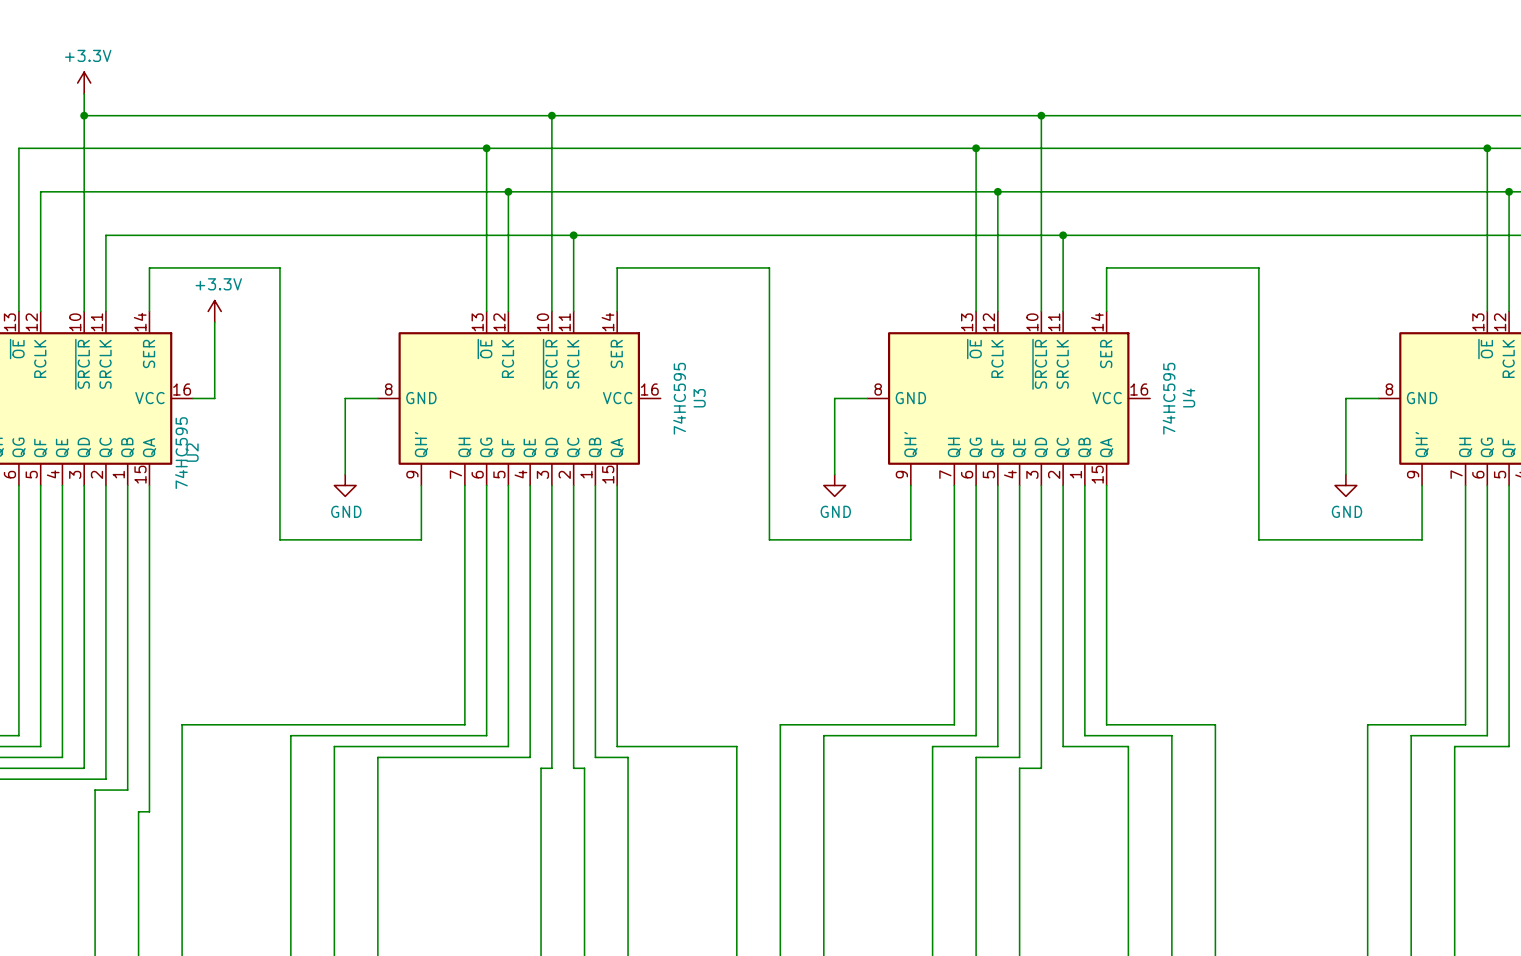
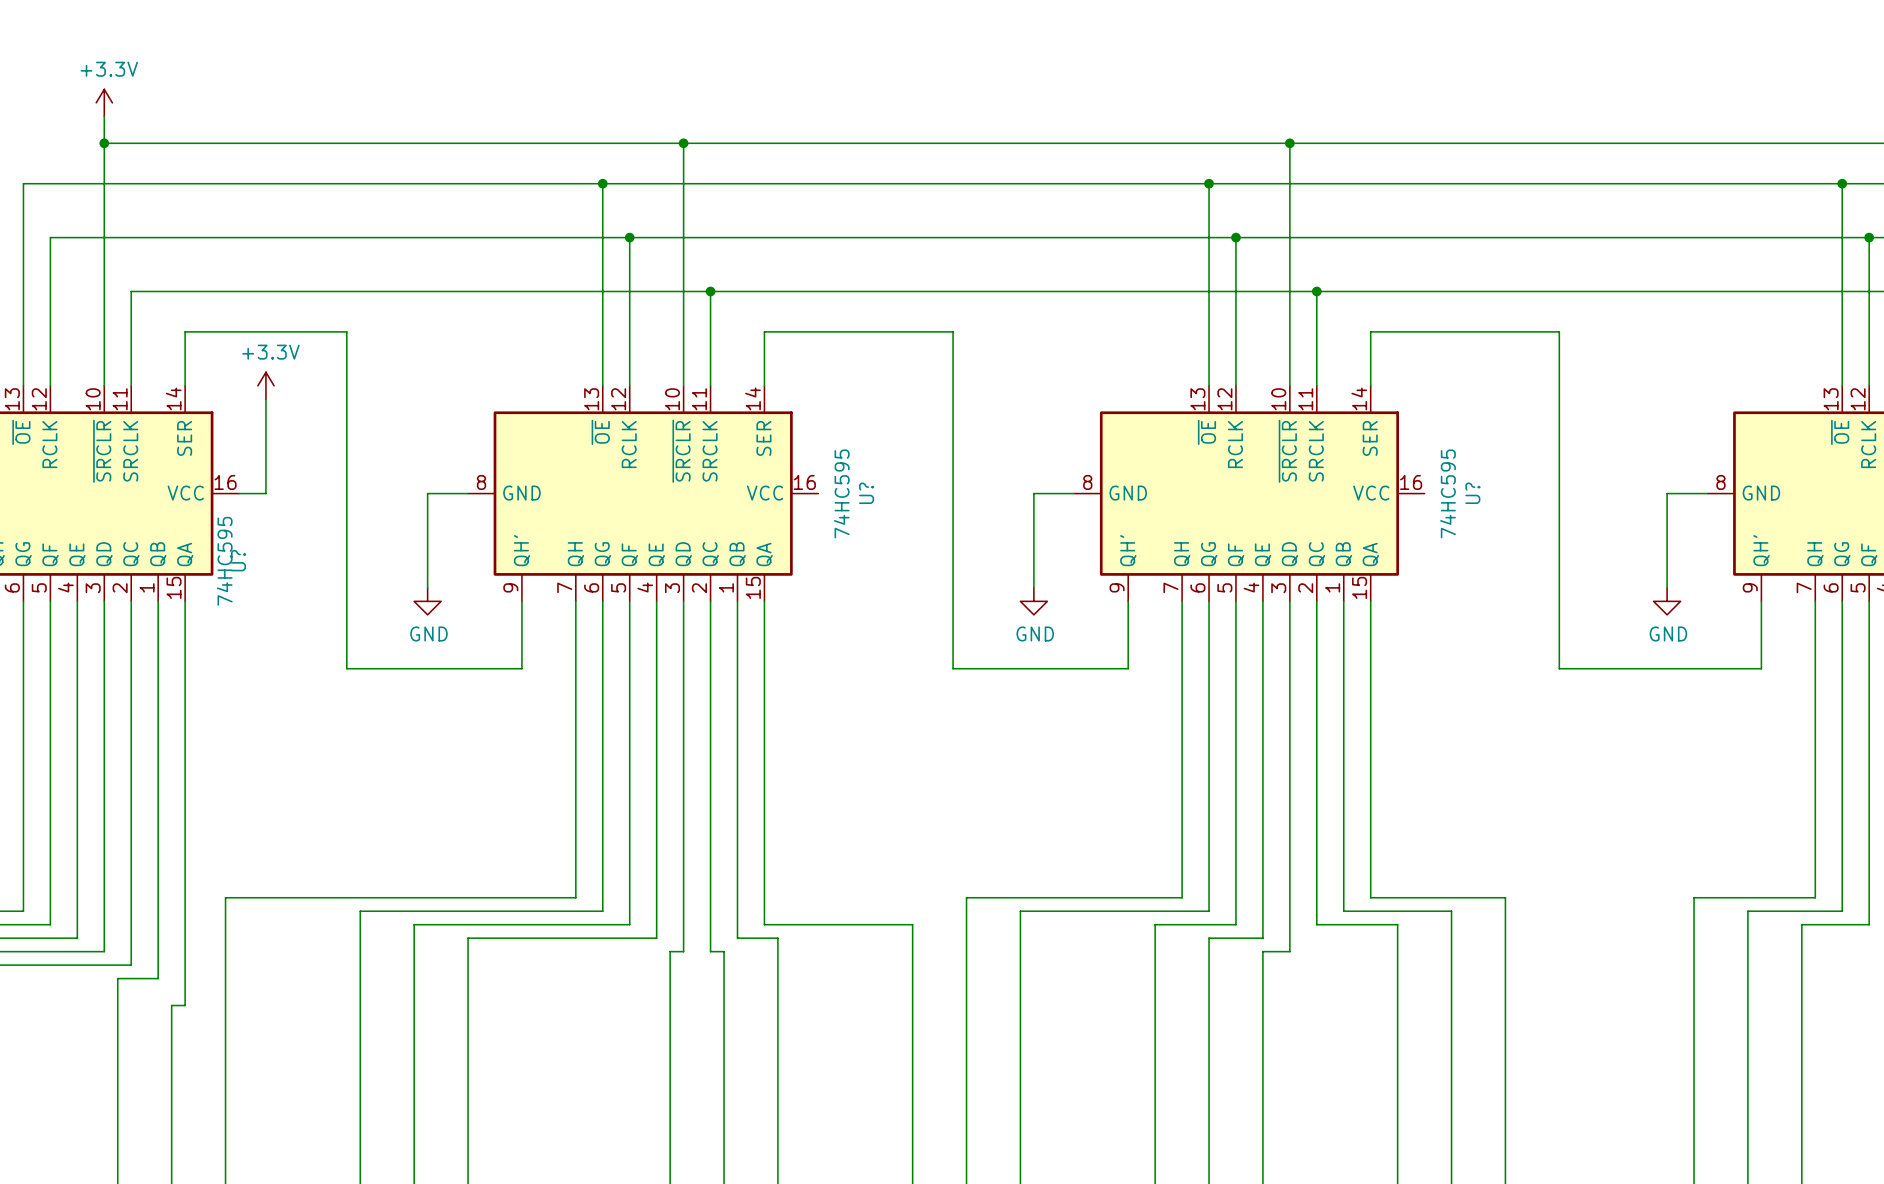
U4 name: U4 (1188, 397) -> U? (1472, 493)
U3 name: U3 (699, 398) -> U? (866, 493)
U2 name: U2 (192, 452) -> U? (238, 560)

